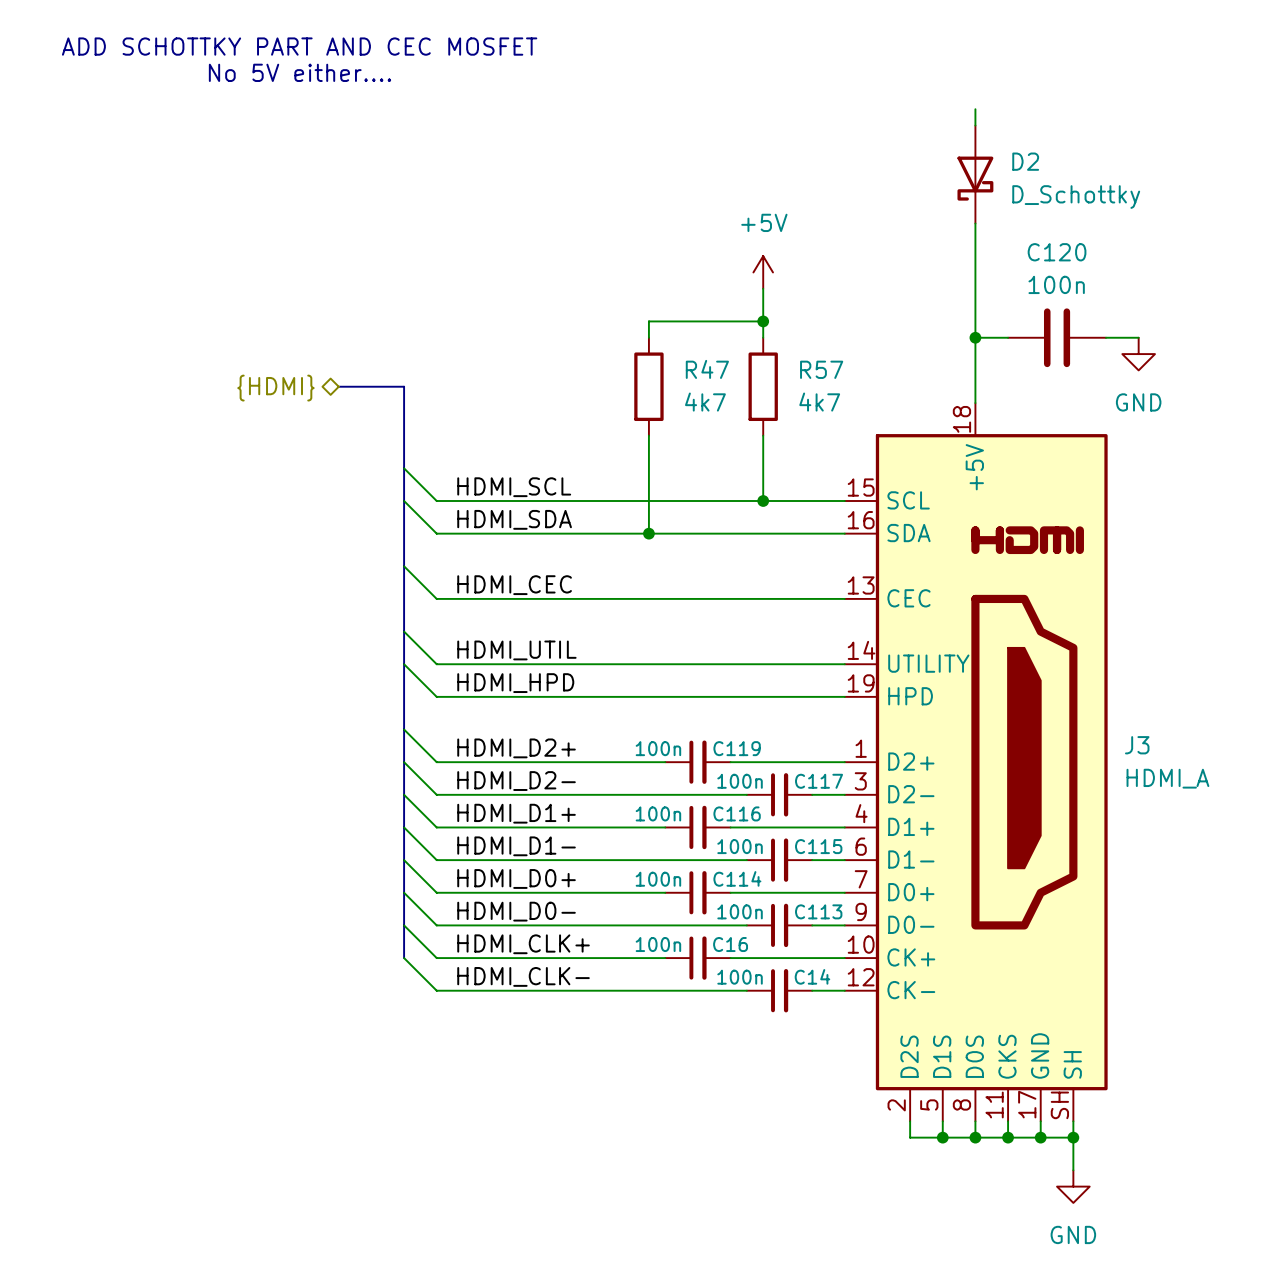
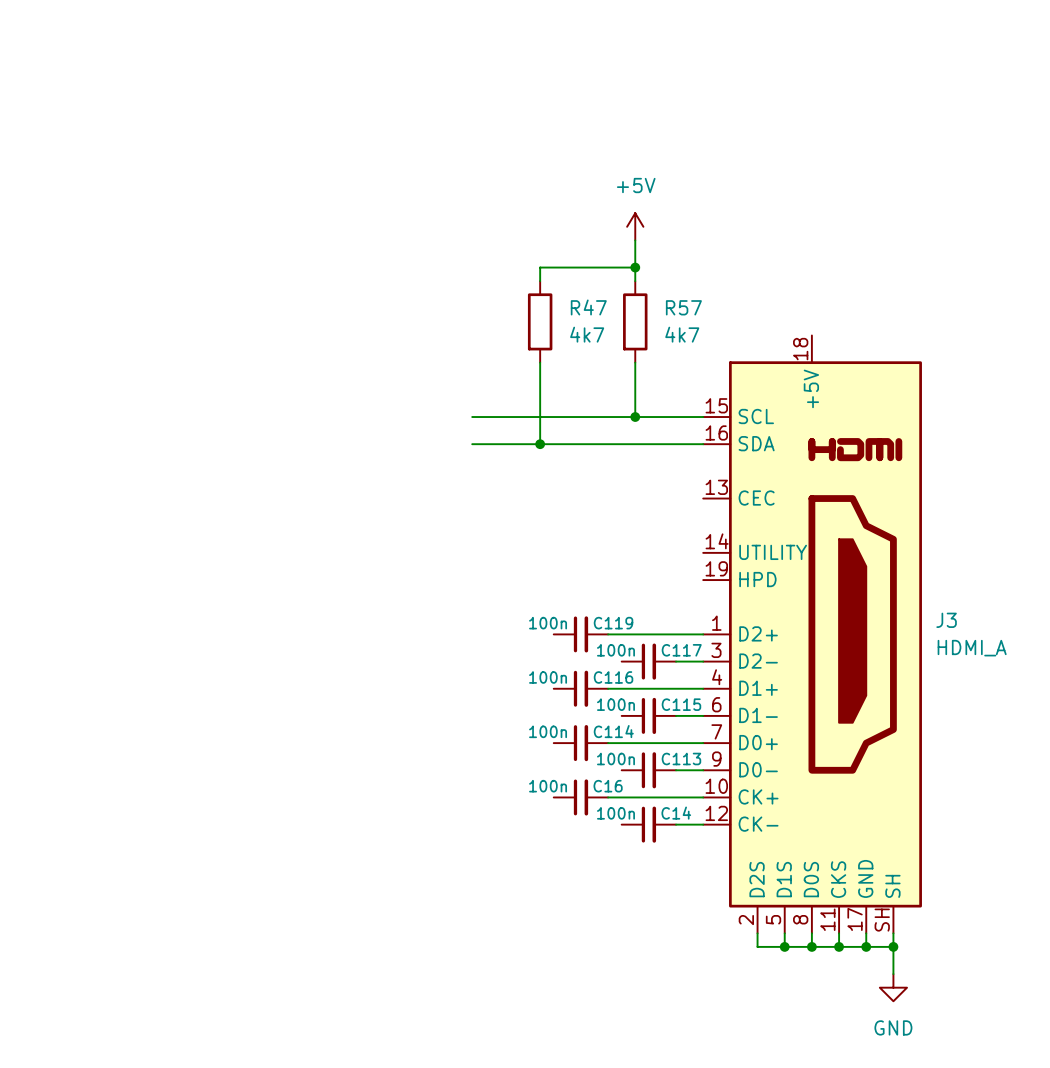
text: ADD SCHOTTKY PART AND CEC MOSFET (299, 46) -> none
text: No 5V either.... (300, 72) -> none
wire: (975, 109) (975, 125) -> none
D2: D_Schottky (975, 174) -> none
wire: (975, 223) (975, 403) -> none
wire: (975, 337) (1008, 337) -> none
junction: (975, 337) -> none
C120: 100n (1057, 337) -> none
wire: (1106, 337) (1138, 337) -> none
power symbol: GND (1138, 354) -> none
bus: (338, 386) (404, 386) (404, 958) -> none
hierarchical label: {HDMI} (275, 388) -> none
wire: (404, 468) (436, 501) (567, 501) -> none
label: HDMI_SCL (514, 487) -> none
wire: (404, 501) (436, 533) (567, 533) -> none
label: HDMI_SDA (514, 519) -> none
wire: (404, 566) (436, 598) (844, 598) -> none
label: HDMI_CEC (514, 585) -> none
wire: (404, 631) (436, 664) (844, 664) -> none
label: HDMI_UTIL (516, 650) -> none
wire: (404, 664) (436, 696) (844, 696) -> none
label: HDMI_HPD (515, 683) -> none
wire: (404, 729) (436, 762) (665, 762) -> none
label: HDMI_D2+ (516, 748) -> none
wire: (404, 762) (436, 794) (746, 794) -> none
label: HDMI_D2- (516, 781) -> none
wire: (404, 794) (436, 827) (665, 827) -> none
label: HDMI_D1+ (516, 813) -> none
wire: (404, 827) (436, 860) (746, 860) -> none
label: HDMI_D1- (516, 846) -> none
wire: (404, 860) (436, 892) (665, 892) -> none
label: HDMI_D0+ (516, 878) -> none
wire: (404, 892) (436, 925) (746, 925) -> none
label: HDMI_D0- (516, 911) -> none
wire: (404, 925) (436, 958) (665, 958) -> none
label: HDMI_CLK+ (523, 944) -> none
wire: (404, 958) (436, 990) (746, 990) -> none
label: HDMI_CLK- (523, 976) -> none

